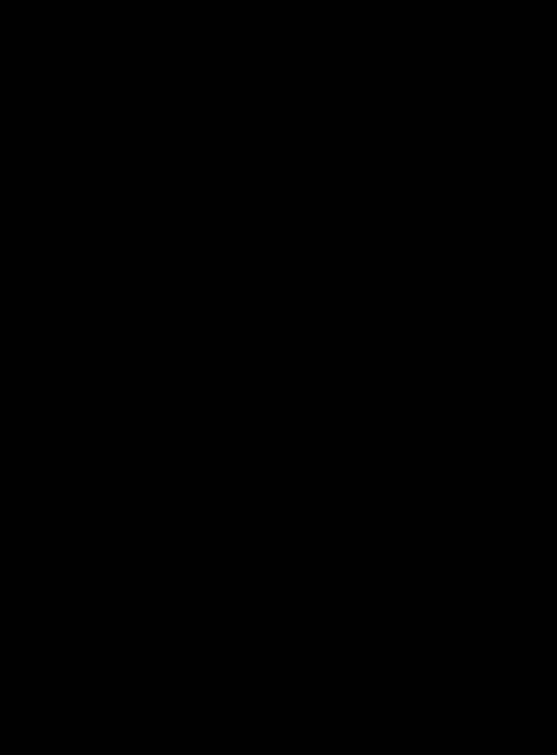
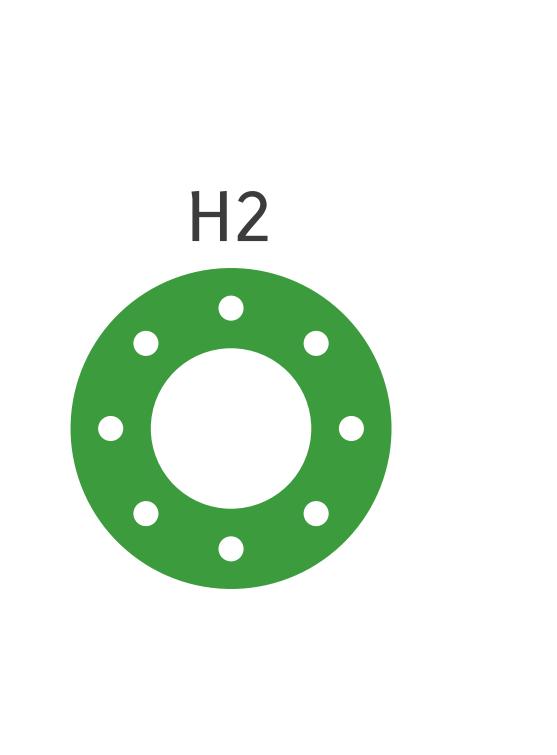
H2: none -> (231, 428)

